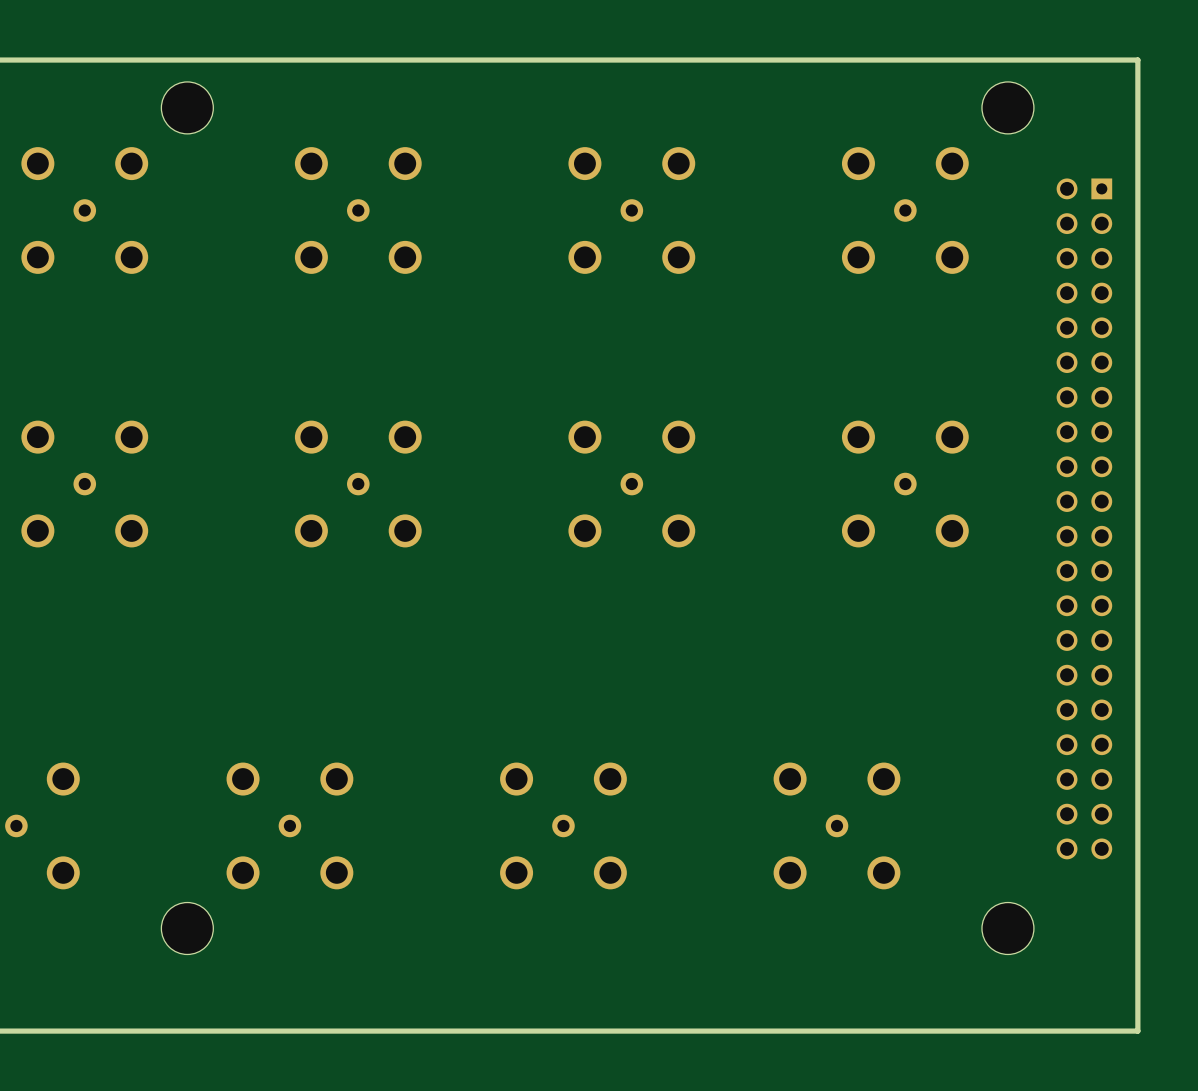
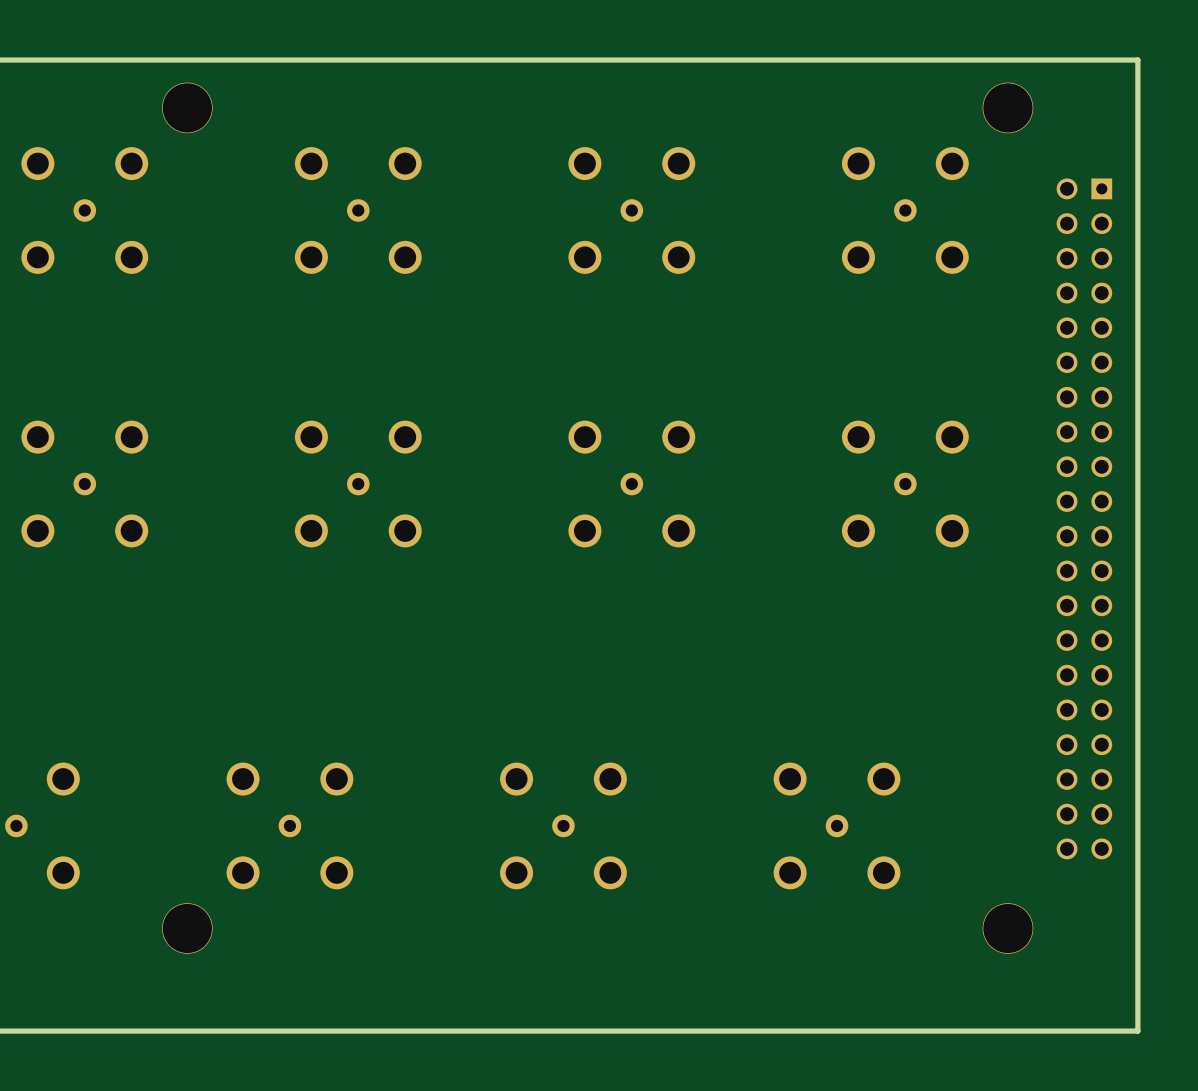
part footprint: [161, 81, 214, 134] -> [162, 82, 213, 134]
part footprint: [981, 81, 1034, 134] -> [982, 82, 1034, 134]
part footprint: [161, 902, 214, 955] -> [162, 903, 213, 954]
part footprint: [981, 902, 1034, 955] -> [982, 903, 1034, 954]

